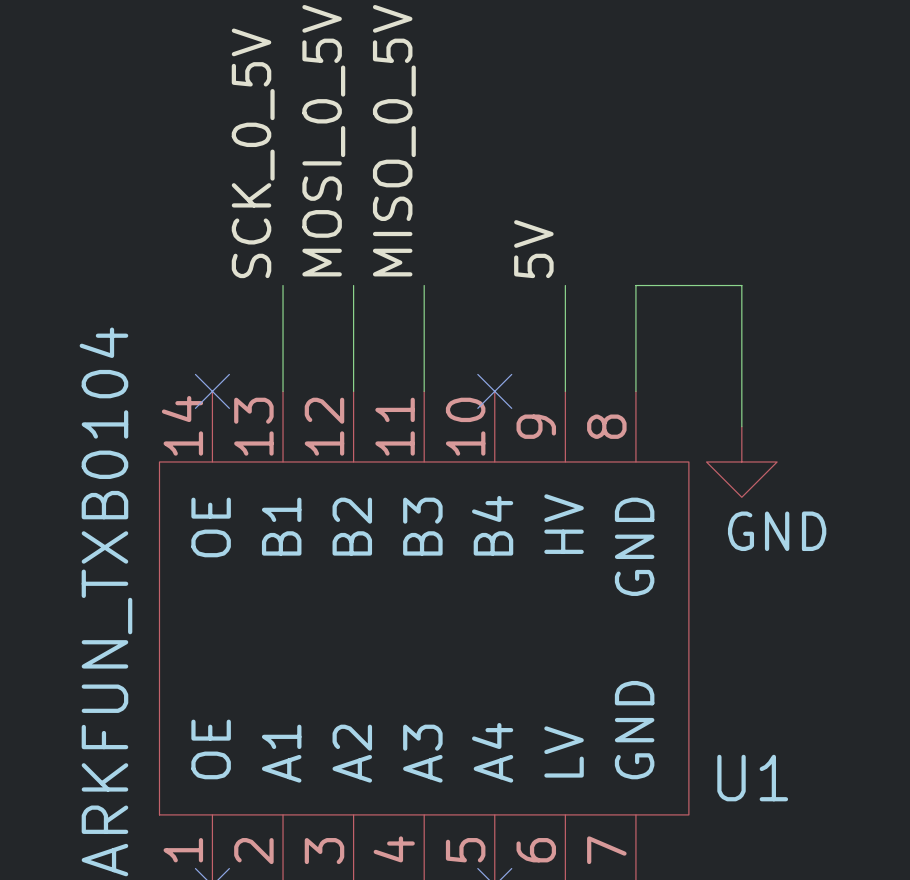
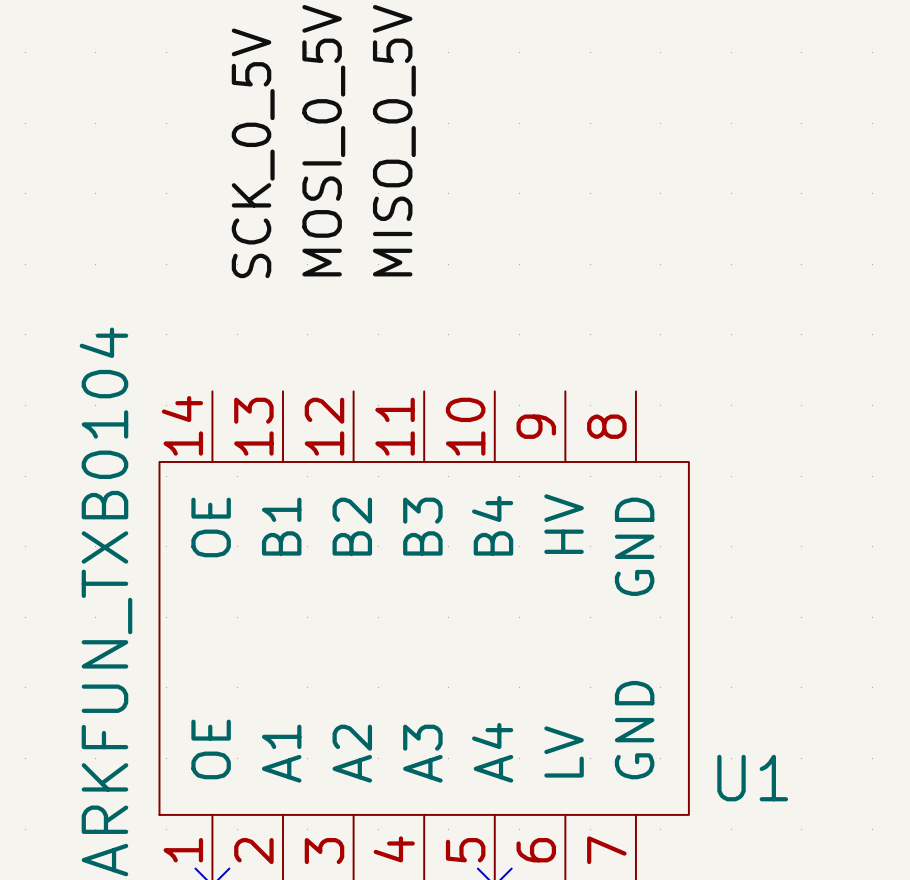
label: 5V (533, 249) -> none
wire: (283, 285) (283, 391) -> none
wire: (353, 285) (353, 391) -> none
wire: (424, 285) (424, 391) -> none
wire: (565, 285) (565, 391) -> none
no-connect mark: (212, 391) -> none
no-connect mark: (494, 391) -> none
wire: (635, 391) (635, 285) (741, 285) (741, 426) -> none
power symbol: GND (741, 461) -> none

